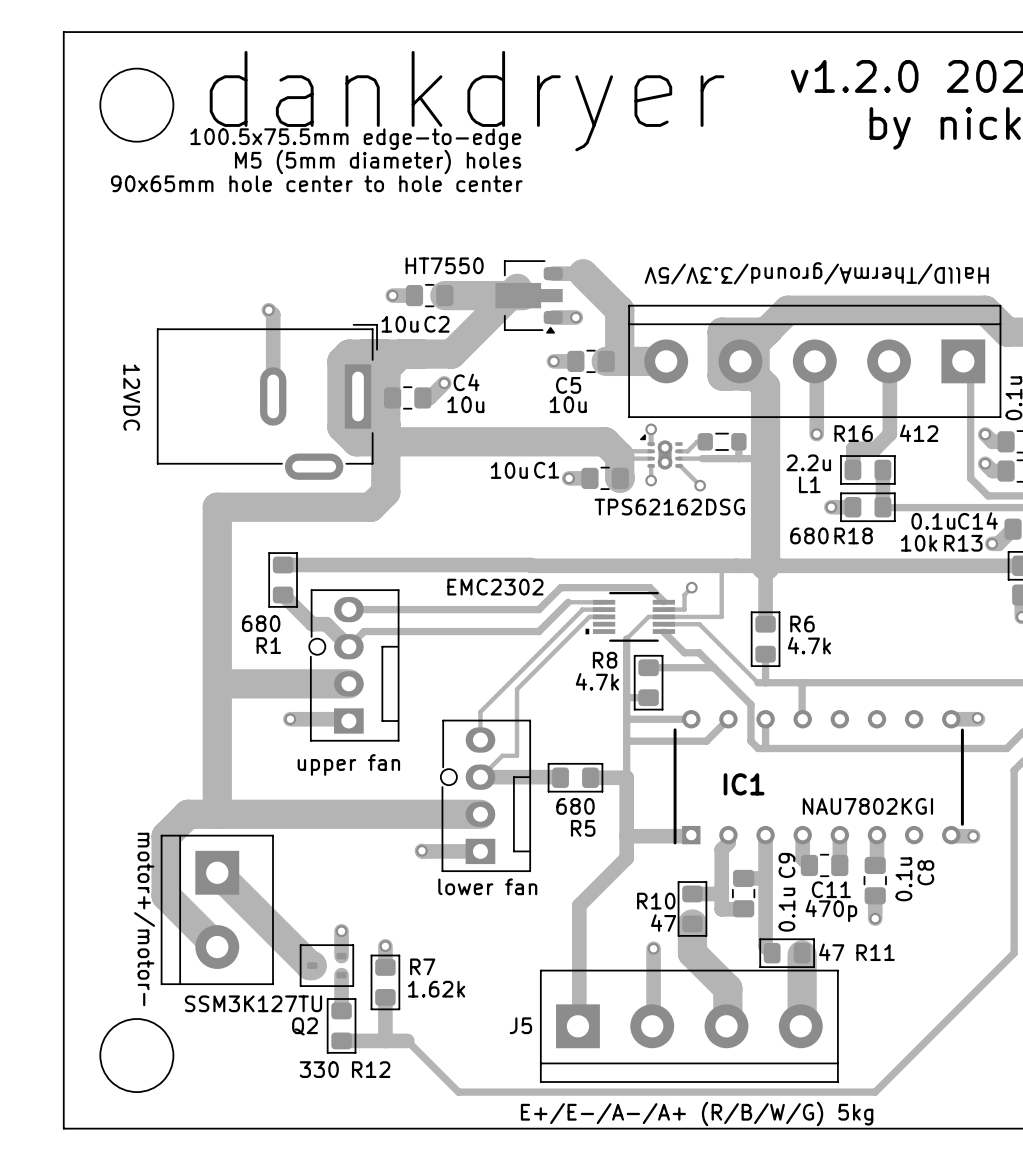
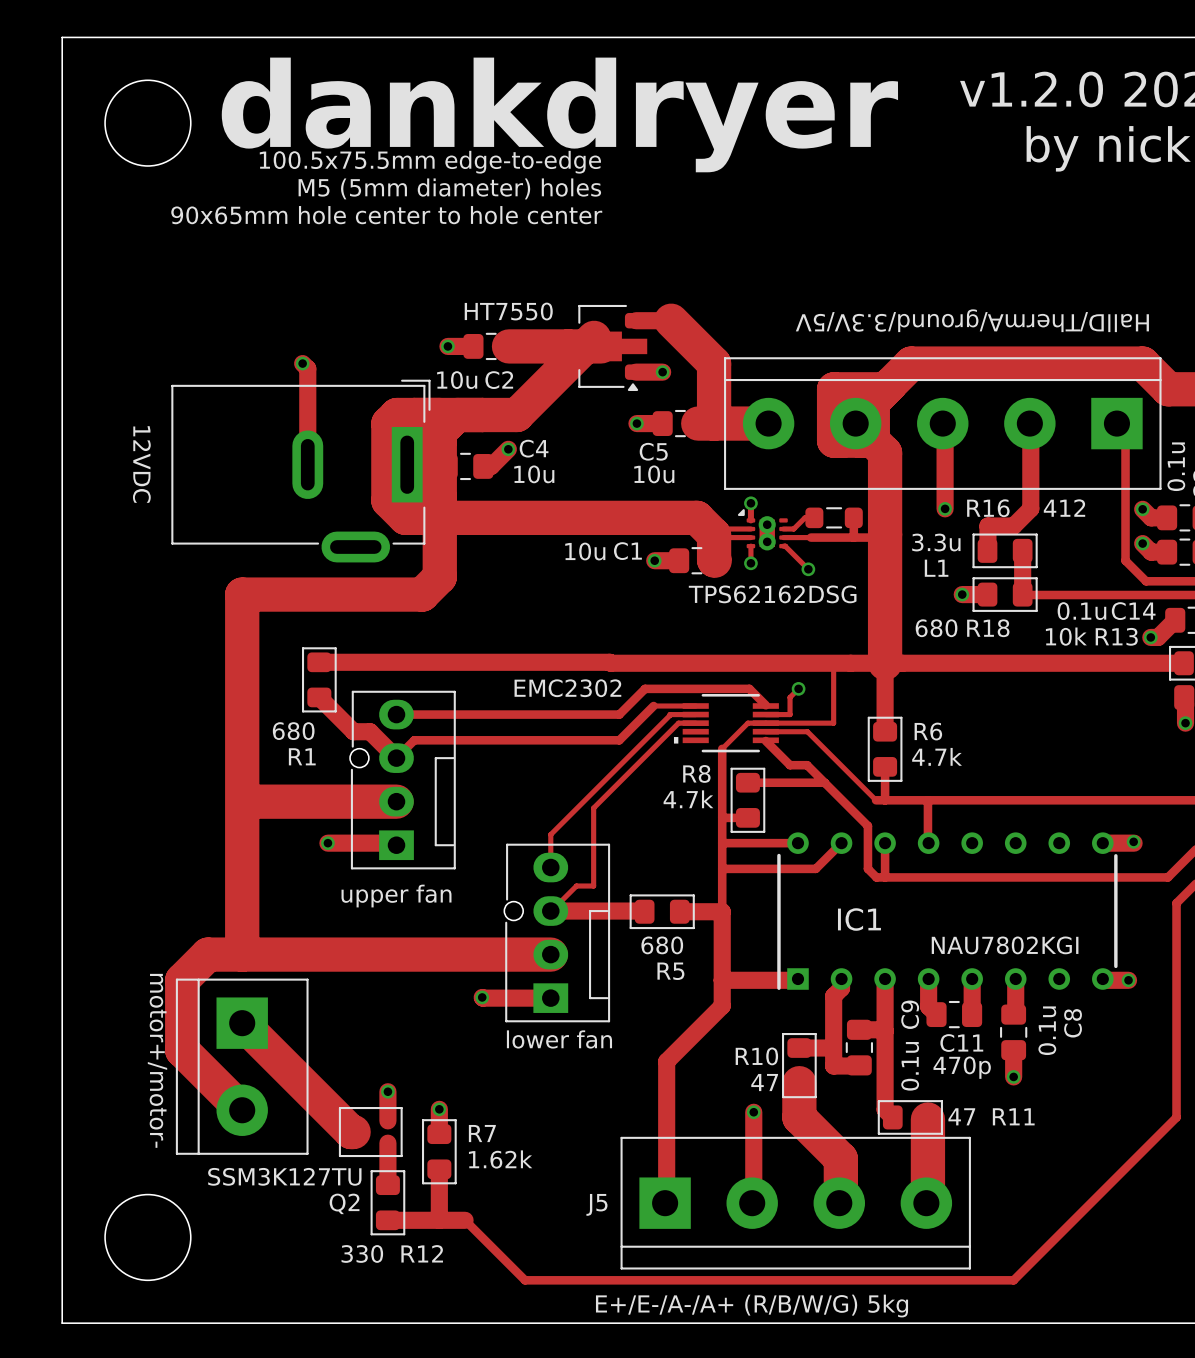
L1 value: 2.2u (808, 462) -> 3.3u (936, 542)

